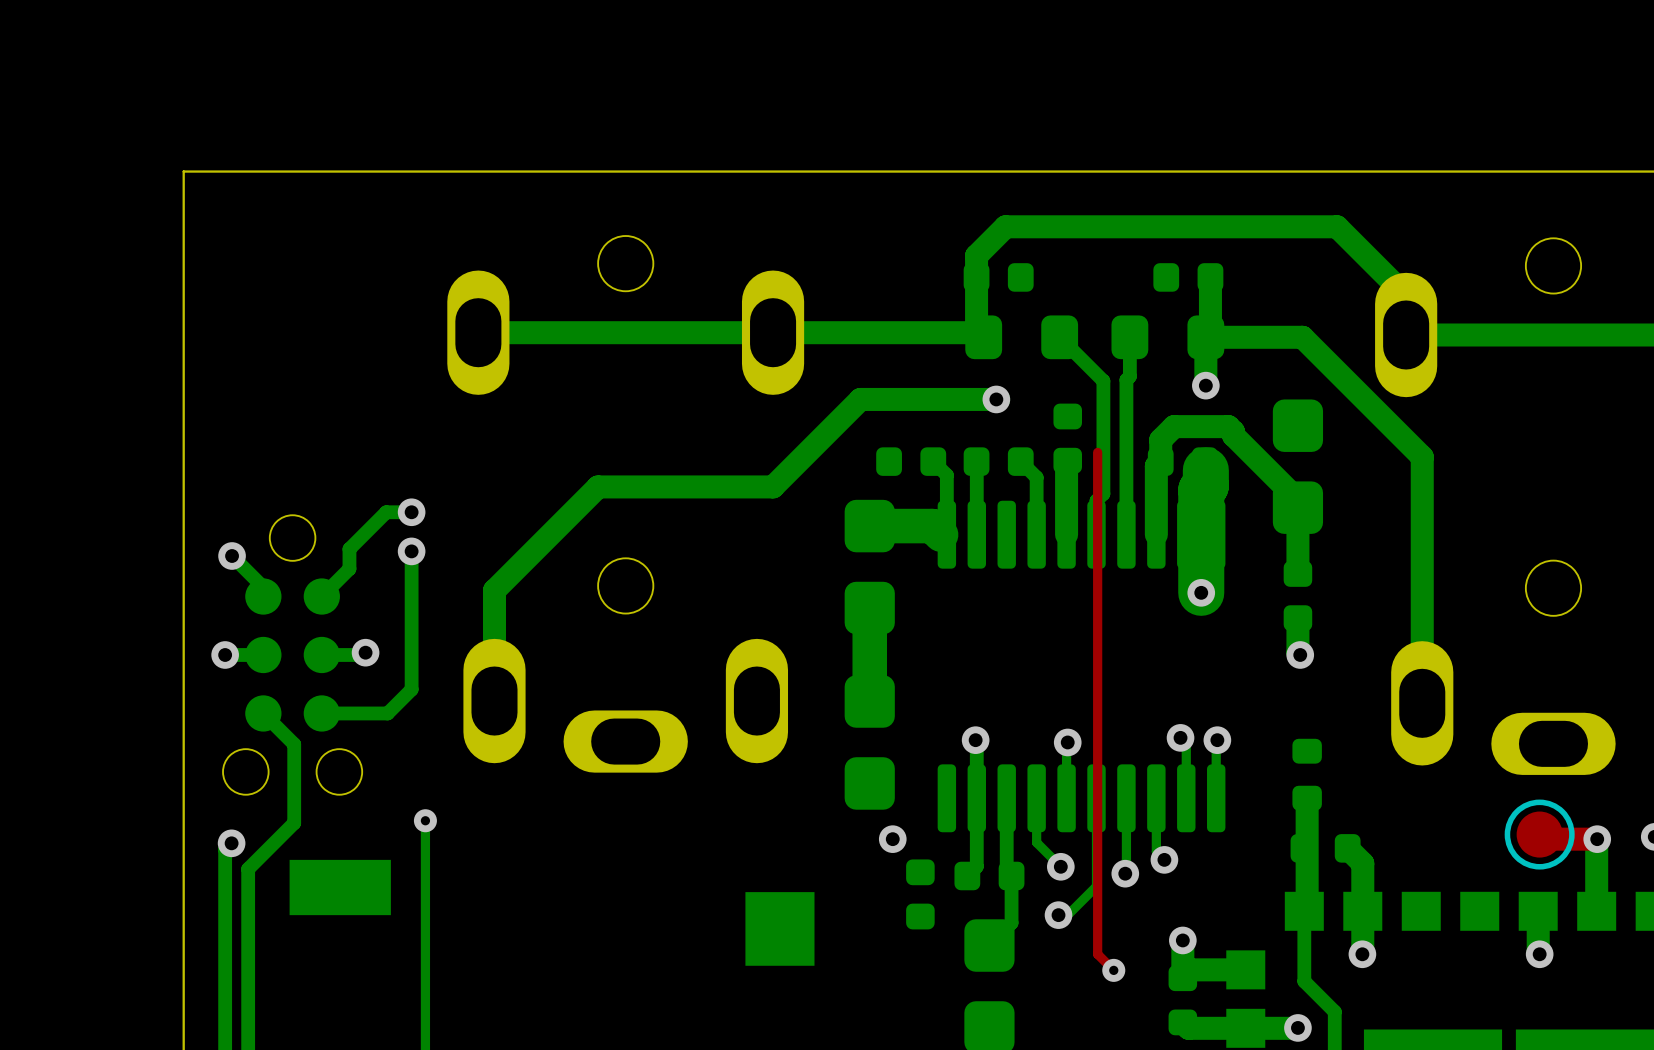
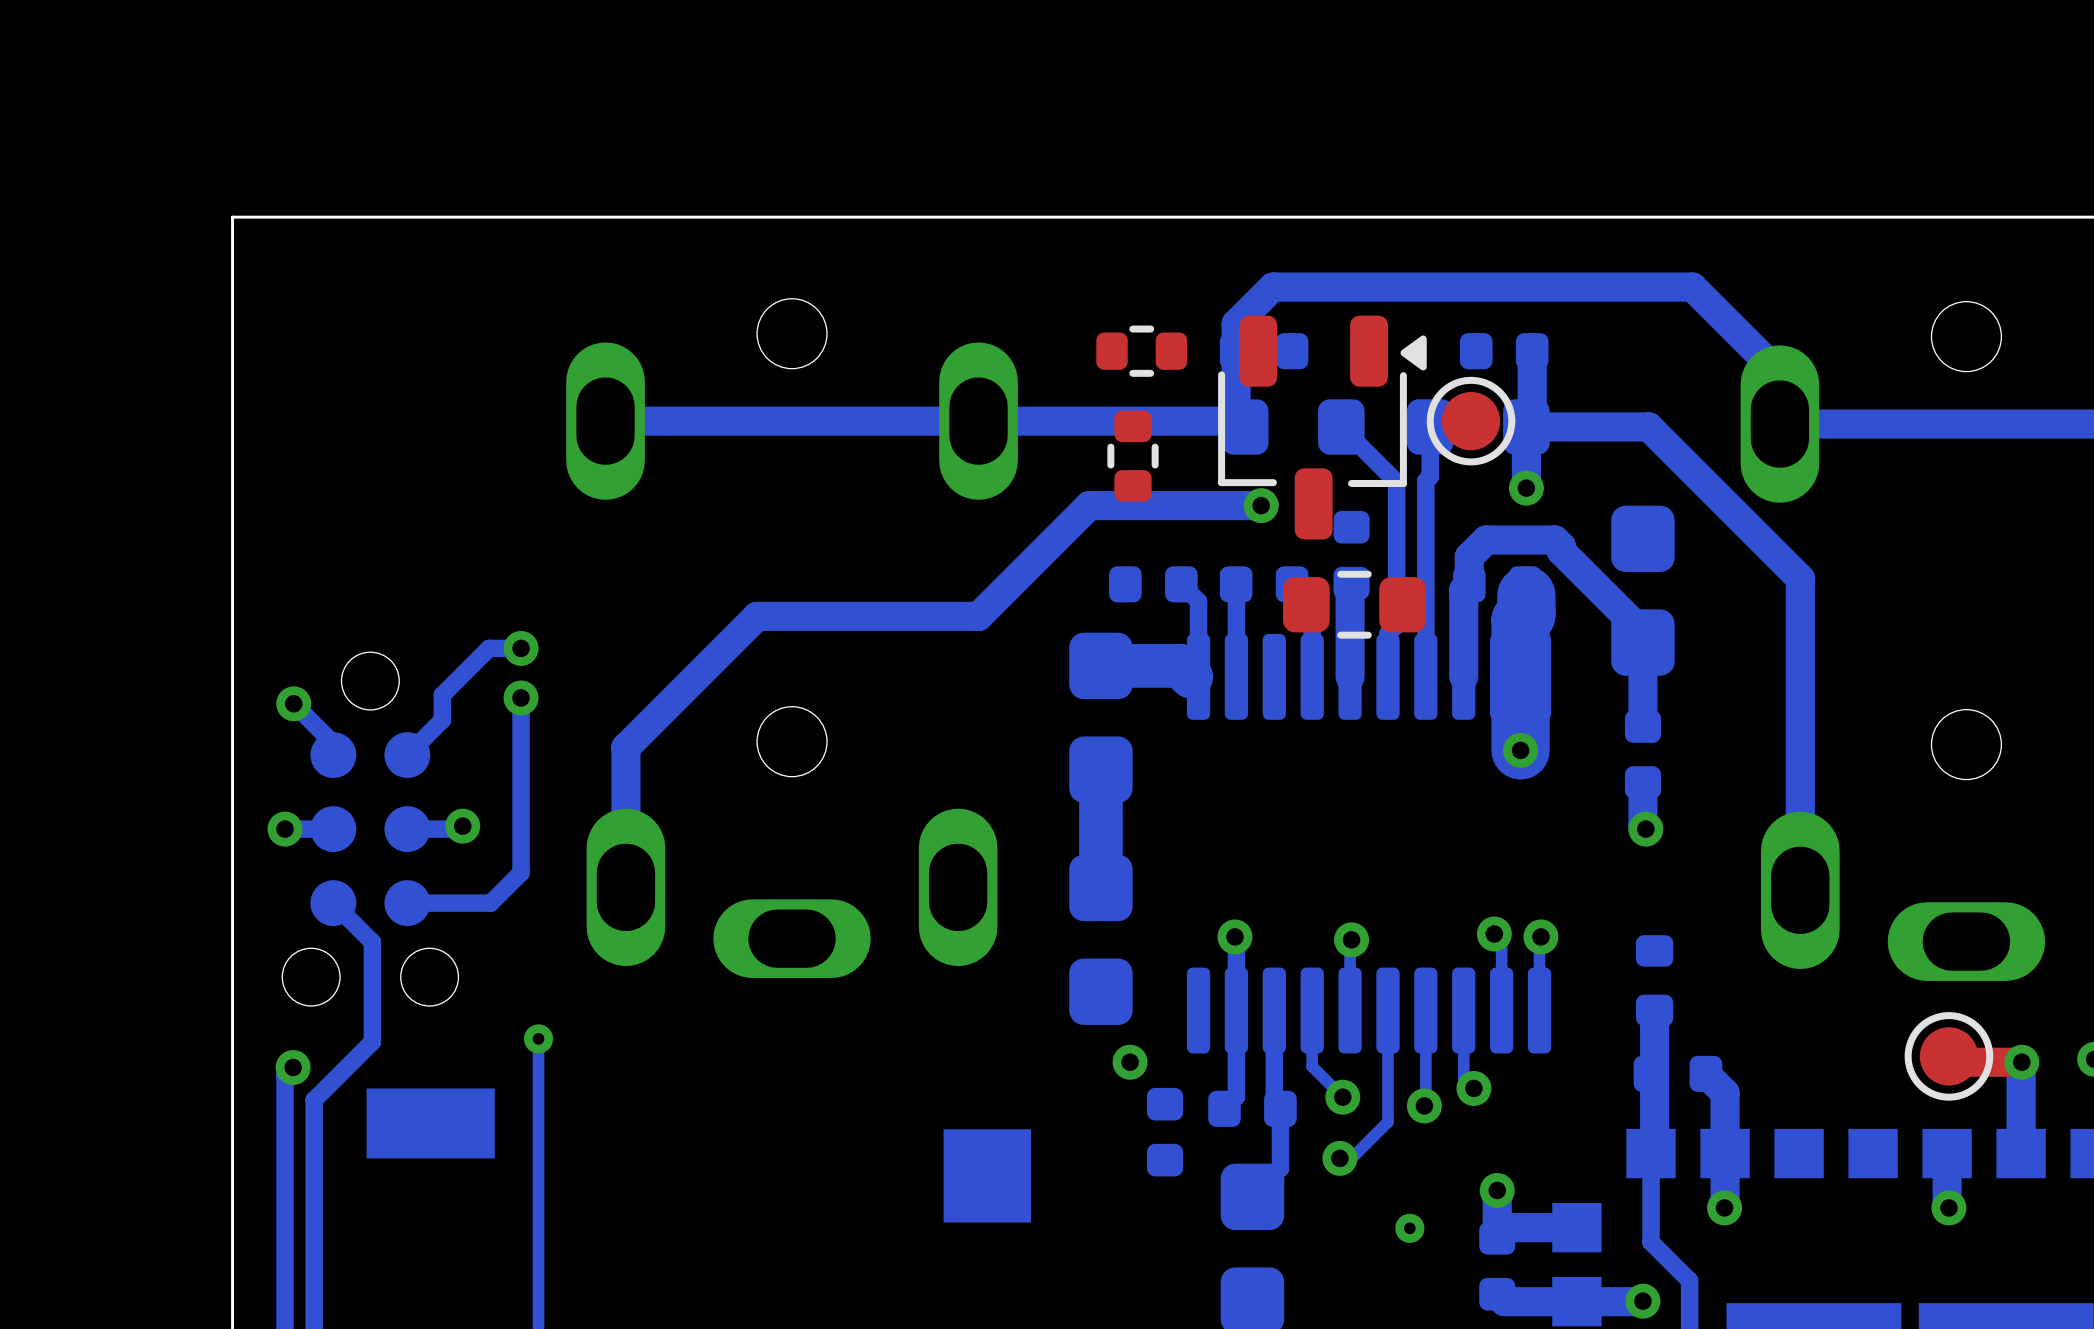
part: none -> (1141, 351)
part: none -> (1471, 421)
part: none -> (1322, 427)
part: none -> (1132, 456)
top track: (1097, 452) (1097, 954) (1113, 970) -> none
part: none -> (1354, 604)

